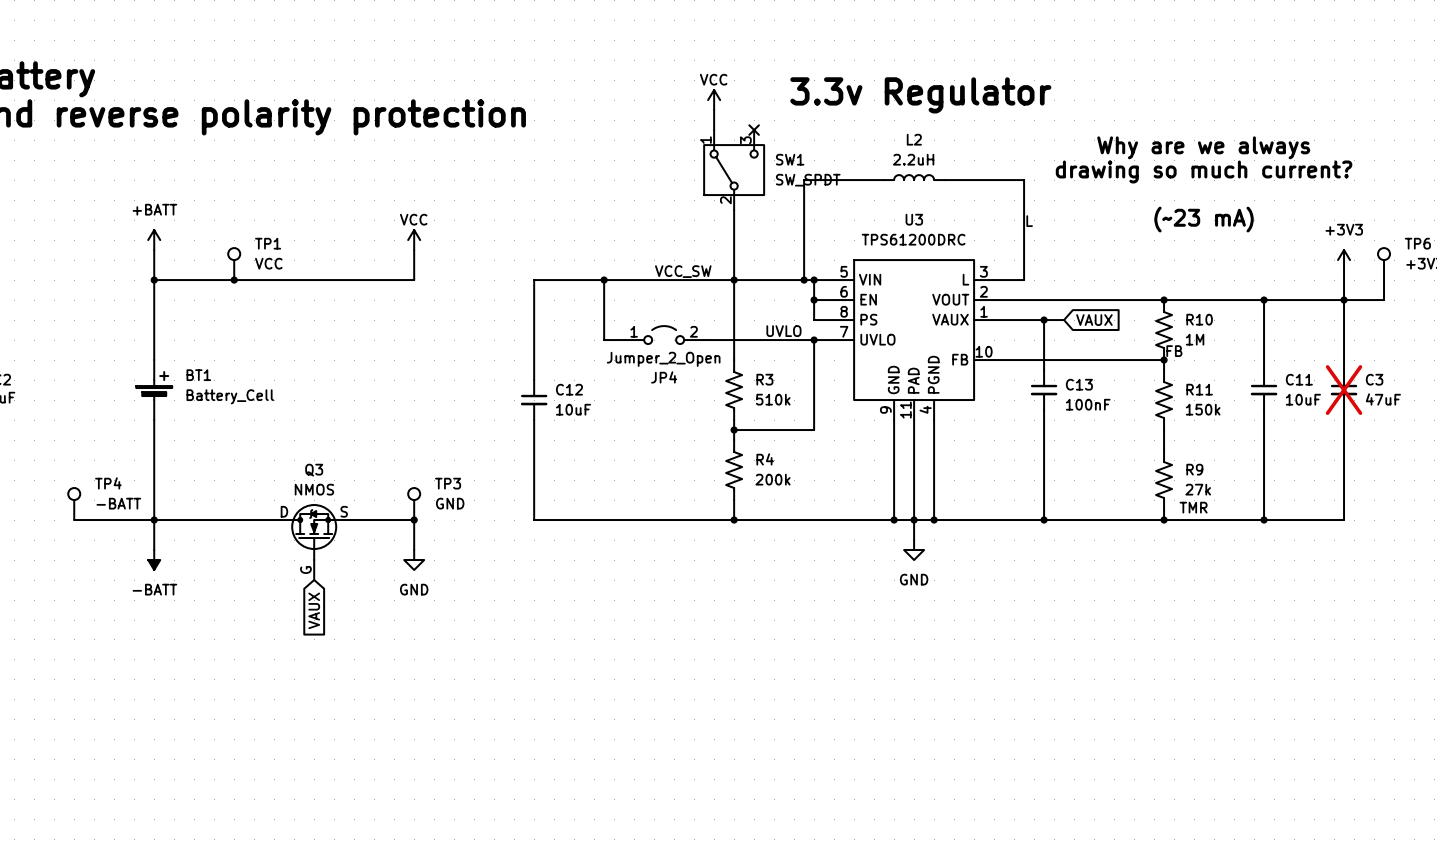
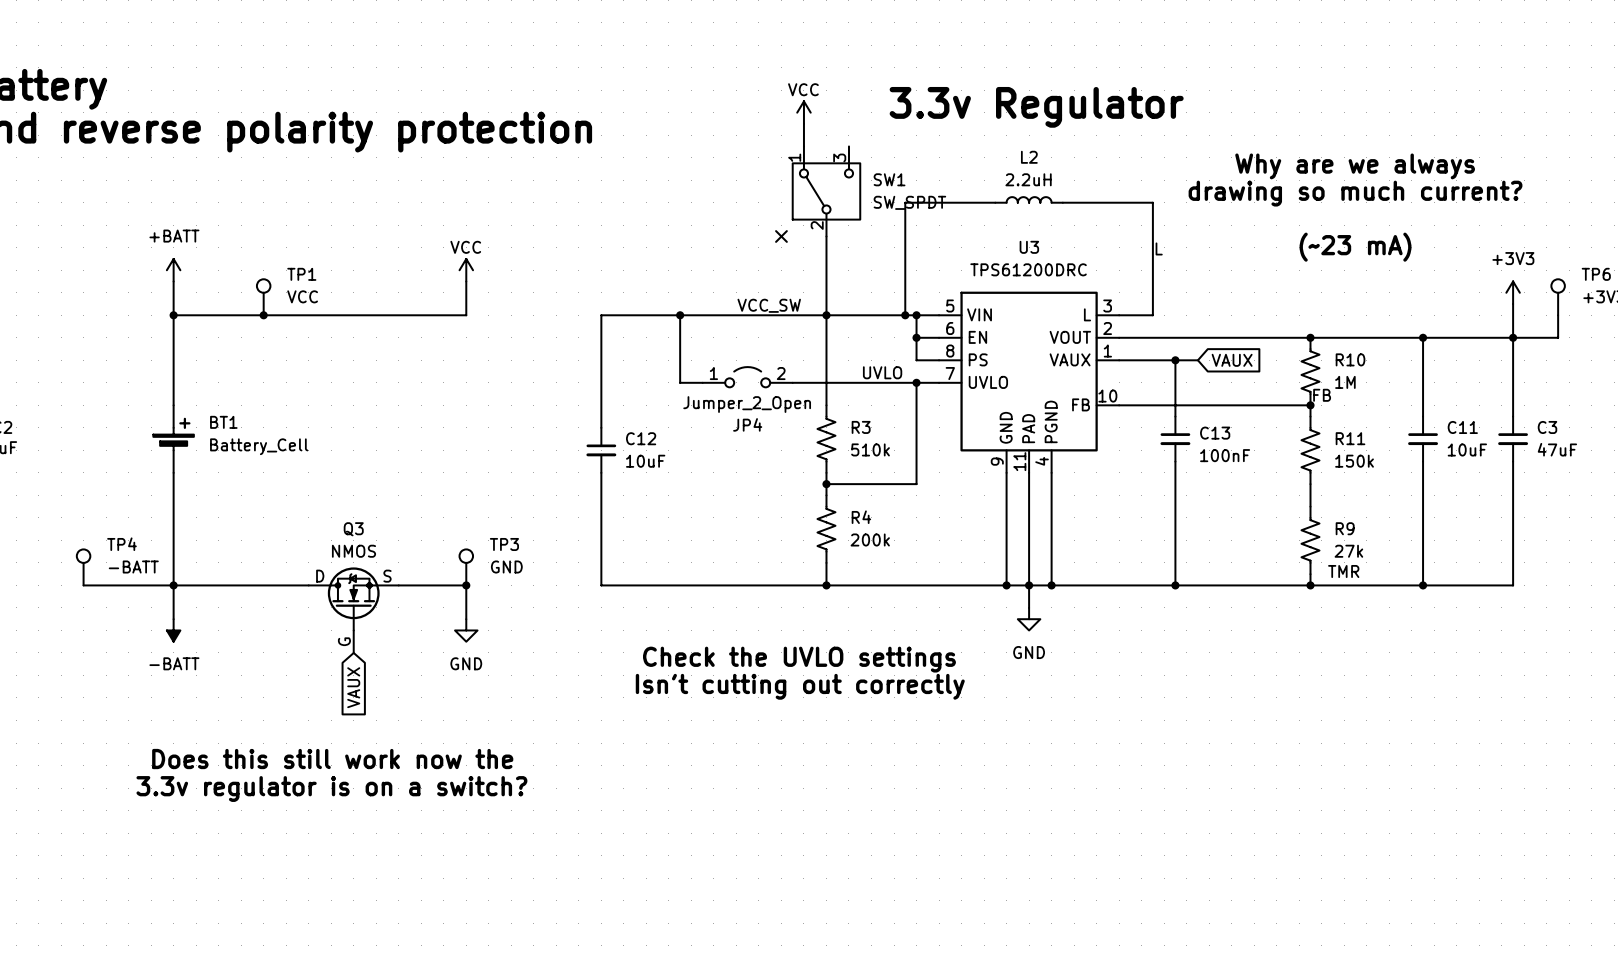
no-connect mark: (754, 130) -> none
no-connect mark: none -> (781, 236)
C3 do-not-place cross: (1344, 390) -> none
text: none -> Check the UVLO settings (799, 659)
text: none -> Isn't cutting out correctly (800, 686)
text: none -> Does this still work now the (332, 759)
text: none -> 3.3v regulator is on a switch? (331, 789)

